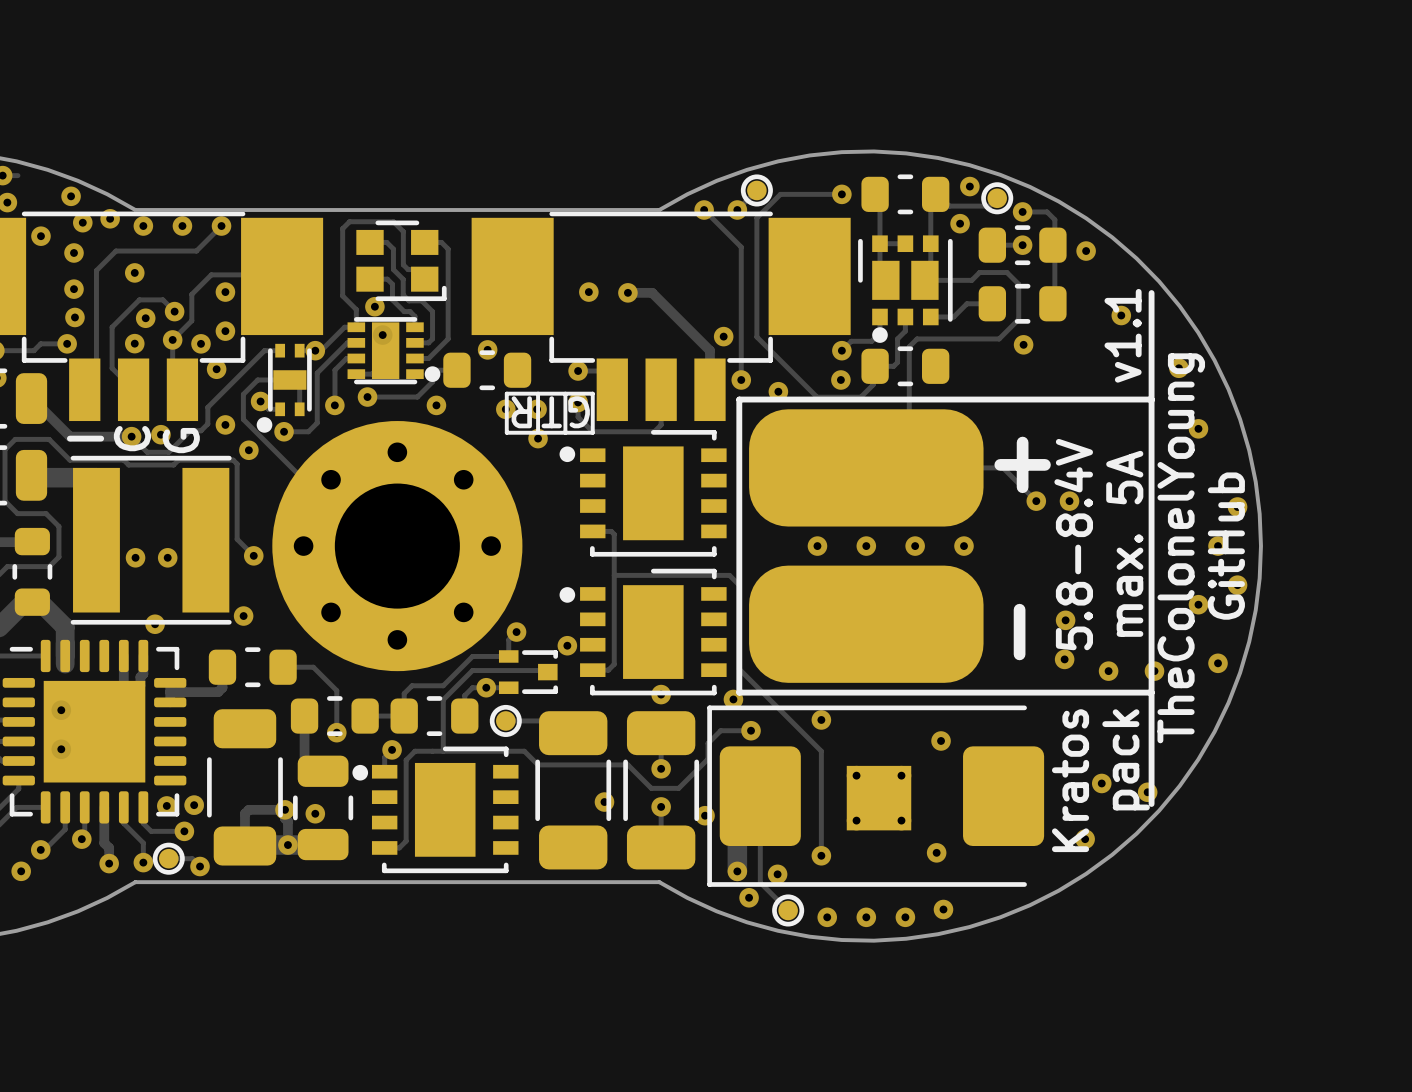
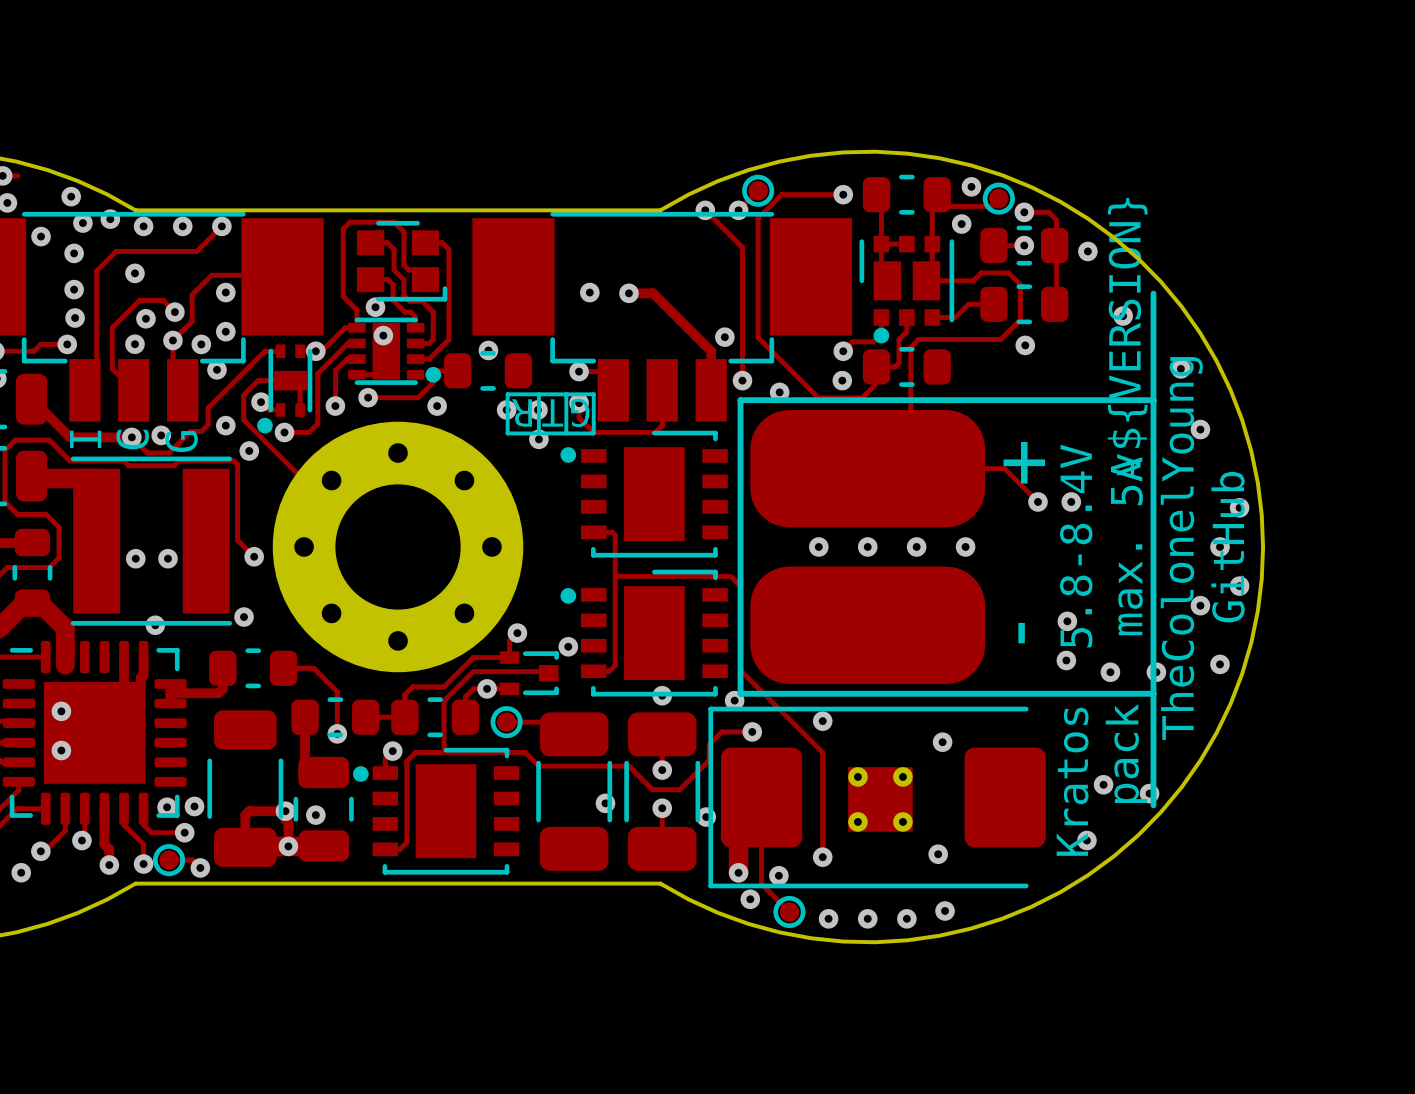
text: v1.1 (1123, 335) -> v${VERSION} (1127, 336)

